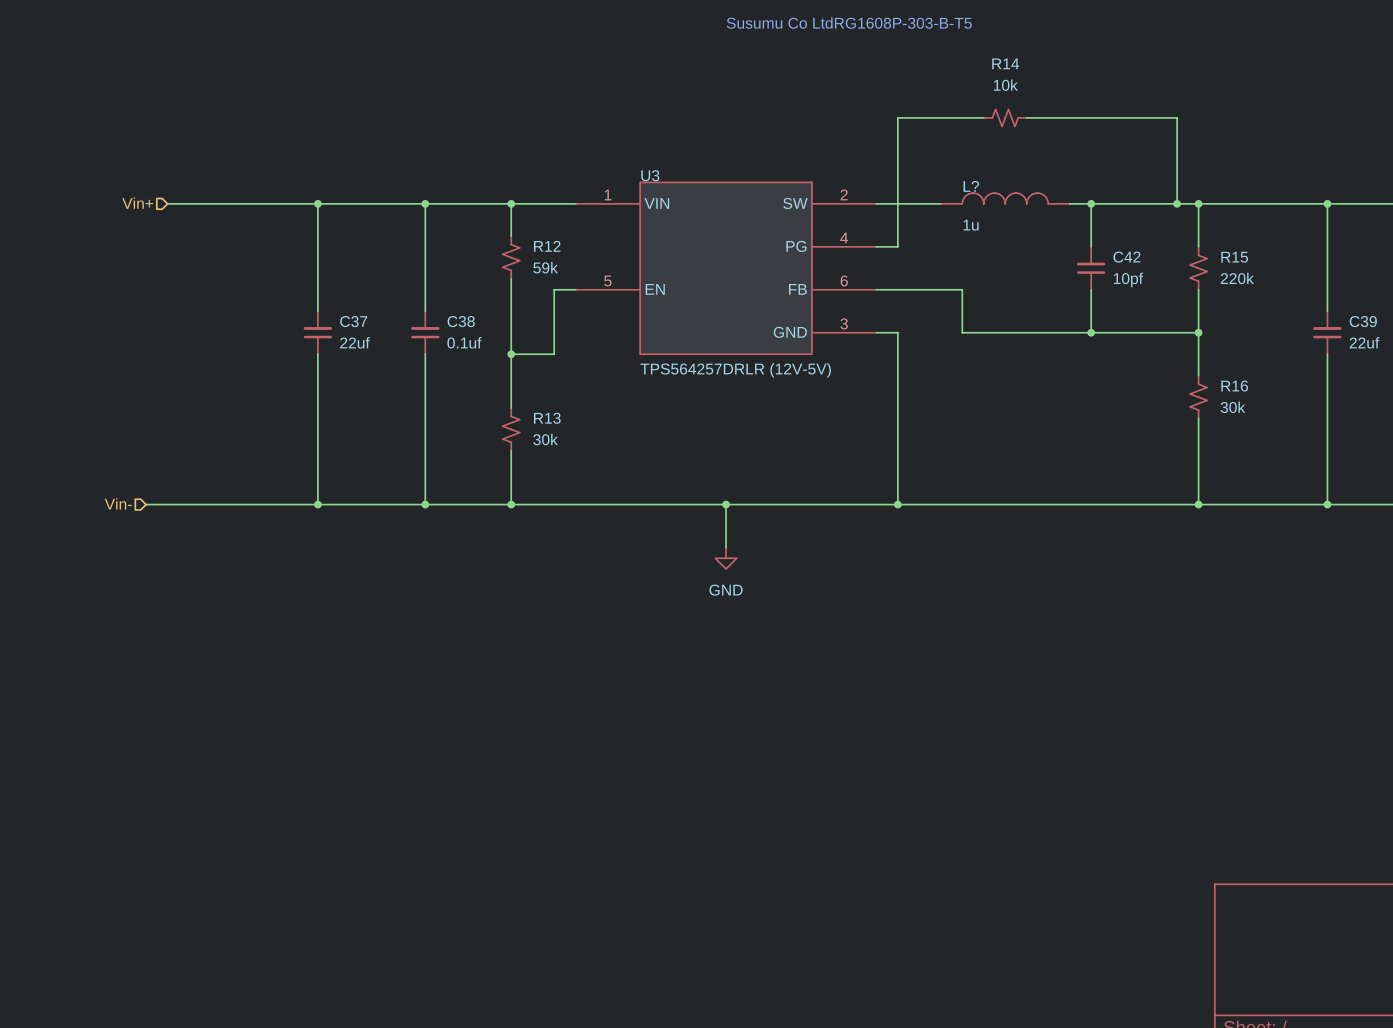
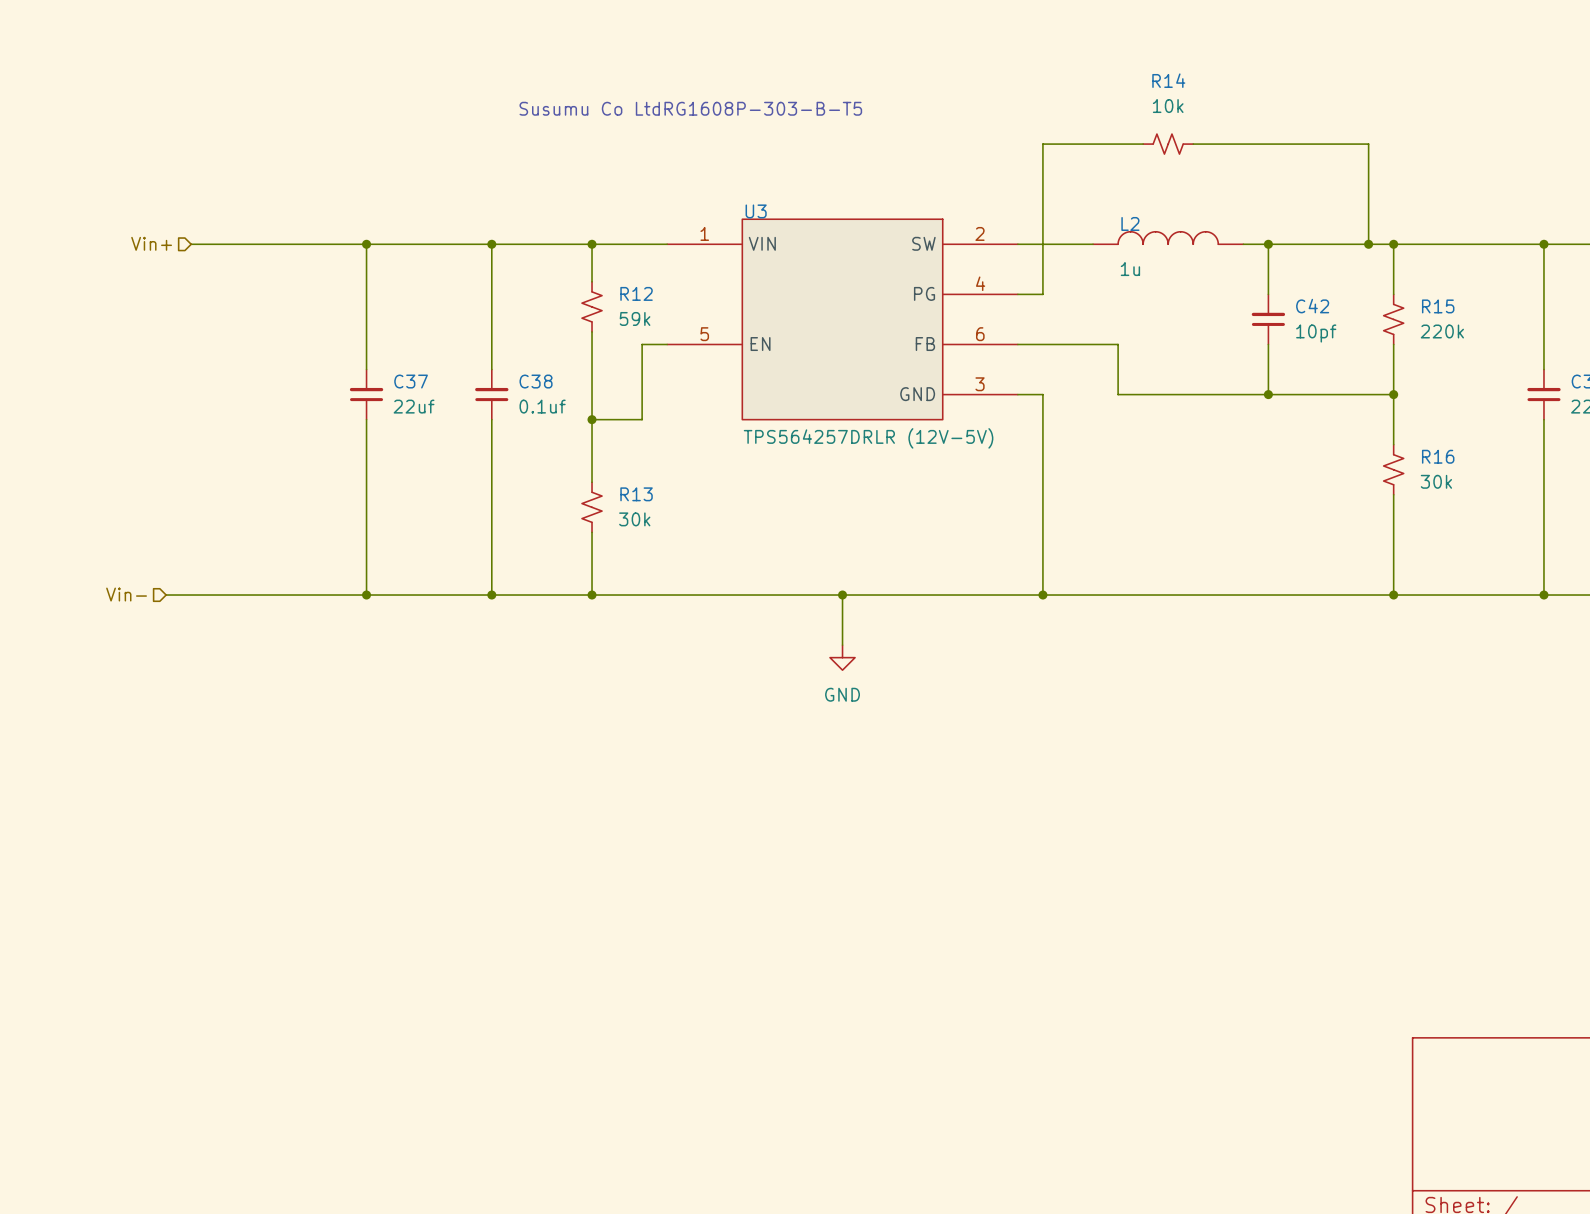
text: Susumu Co LtdRG1608P-303-B-T5 (849, 23) -> none
text: none -> Susumu Co LtdRG1608P-303-B-T5 (690, 108)
L? name: L? (971, 186) -> L2 (1130, 223)

